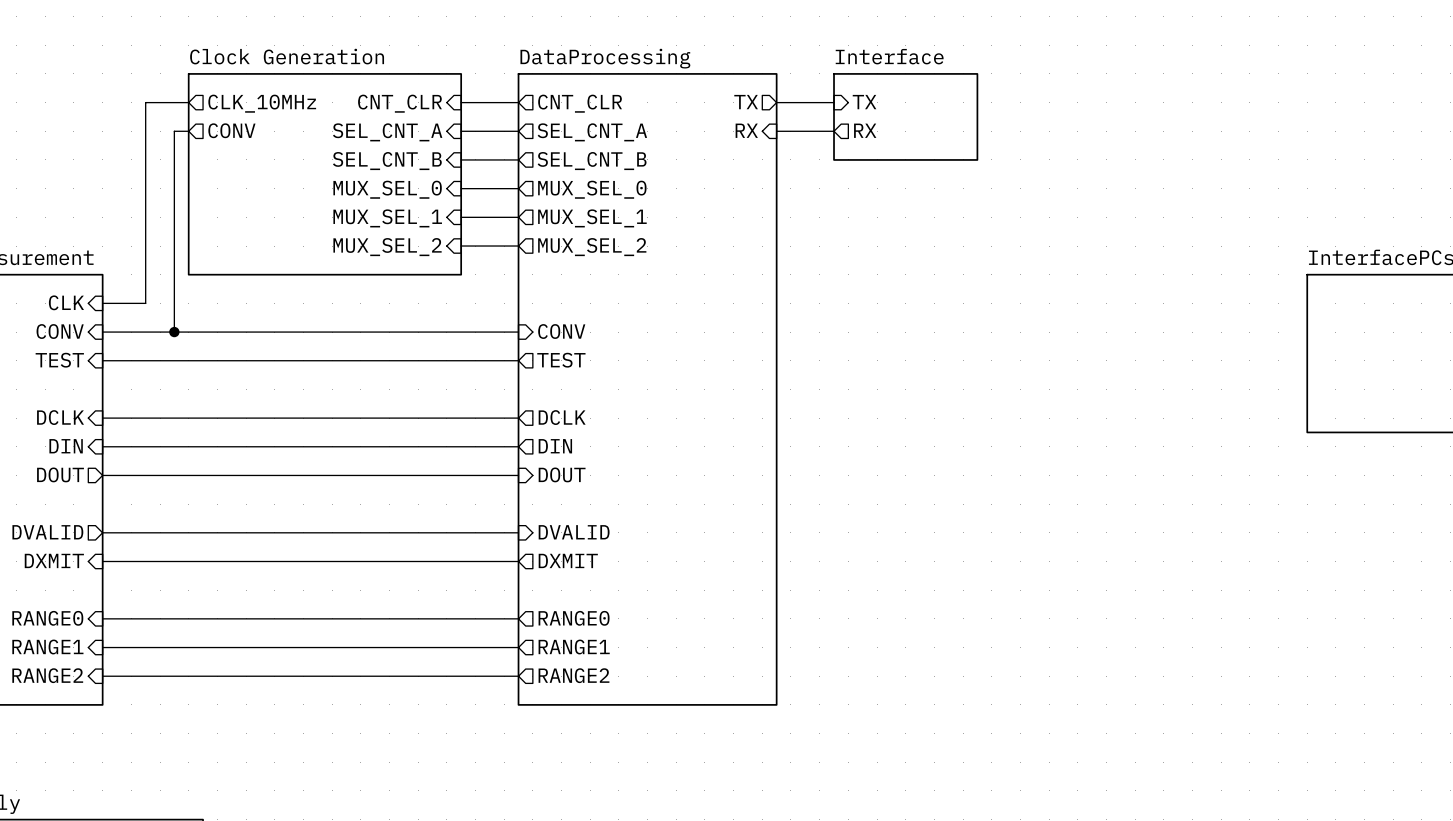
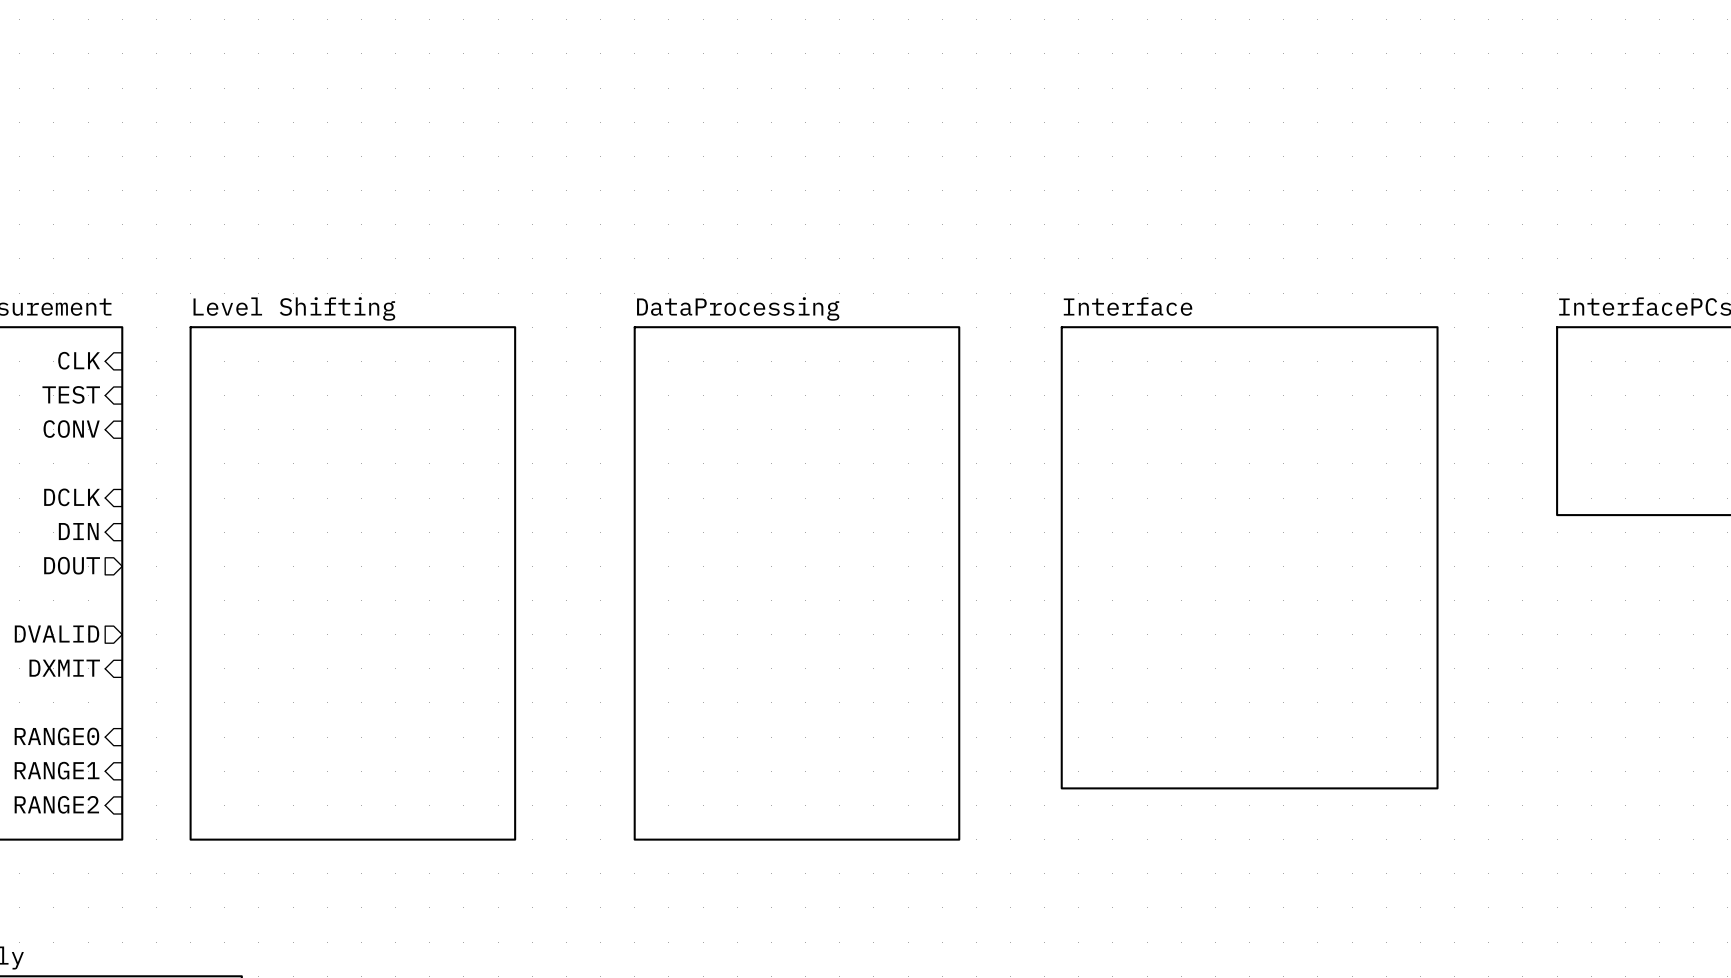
wire: (188, 102) (145, 102) (145, 303) (102, 303) -> none
wire: (461, 102) (518, 102) -> none
sheet pin: TX (746, 102) -> none
wire: (776, 102) (834, 102) -> none
sheet pin: TX (864, 102) -> none
sheet pin: CLK_10MHz (262, 103) -> none
sheet pin: CNT_CLR (400, 103) -> none
sheet pin: CNT_CLR (580, 103) -> none
sheet Interface: (905, 116) -> none
sheet pin: CONV (231, 130) -> none
sheet pin: RX (746, 130) -> none
sheet pin: RX (865, 130) -> none
wire: (188, 131) (174, 131) (174, 332) -> none
wire: (461, 131) (518, 131) -> none
wire: (776, 131) (834, 131) -> none
sheet pin: SEL_CNT_A (387, 132) -> none
sheet pin: SEL_CNT_A (592, 132) -> none
wire: (461, 159) (518, 159) -> none
sheet pin: SEL_CNT_B (387, 161) -> none
sheet pin: SEL_CNT_B (592, 161) -> none
sheet Clock Generation: (324, 174) -> none
wire: (461, 188) (518, 188) -> none
sheet pin: MUX_SEL_0 (387, 189) -> none
sheet pin: MUX_SEL_0 (592, 189) -> none
wire: (461, 217) (518, 217) -> none
sheet pin: MUX_SEL_1 (387, 218) -> none
sheet pin: MUX_SEL_1 (592, 218) -> none
wire: (461, 246) (518, 246) -> none
sheet pin: MUX_SEL_2 (387, 247) -> none
sheet pin: MUX_SEL_2 (592, 247) -> none
sheet pin: CONV (60, 331) -> TEST (71, 394)
sheet pin: CONV (561, 331) -> none
wire: (102, 332) (518, 332) -> none
junction: (174, 332) -> none
sheet pin: TEST (59, 360) -> CONV (71, 429)
wire: (102, 360) (518, 360) -> none
sheet pin: TEST (561, 360) -> none
sheet DataProcessing: (647, 389) -> none
sheet pin: DCLK (562, 417) -> none
wire: (102, 418) (518, 418) -> none
wire: (102, 446) (518, 446) -> none
sheet pin: DIN (555, 446) -> none
sheet Interface: none -> (1249, 557)
sheet pin: DOUT (562, 474) -> none
wire: (102, 475) (518, 475) -> none
sheet Level Shifting: none -> (352, 583)
sheet DataProcessing: none -> (796, 583)
wire: (102, 532) (518, 532) -> none
sheet pin: DVALID (574, 532) -> none
sheet pin: DXMIT (568, 560) -> none
wire: (102, 561) (518, 561) -> none
wire: (102, 618) (518, 618) -> none
sheet pin: RANGE0 (574, 618) -> none
wire: (102, 647) (518, 647) -> none
sheet pin: RANGE1 (574, 647) -> none
sheet pin: RANGE2 (573, 675) -> none
wire: (102, 676) (518, 676) -> none

